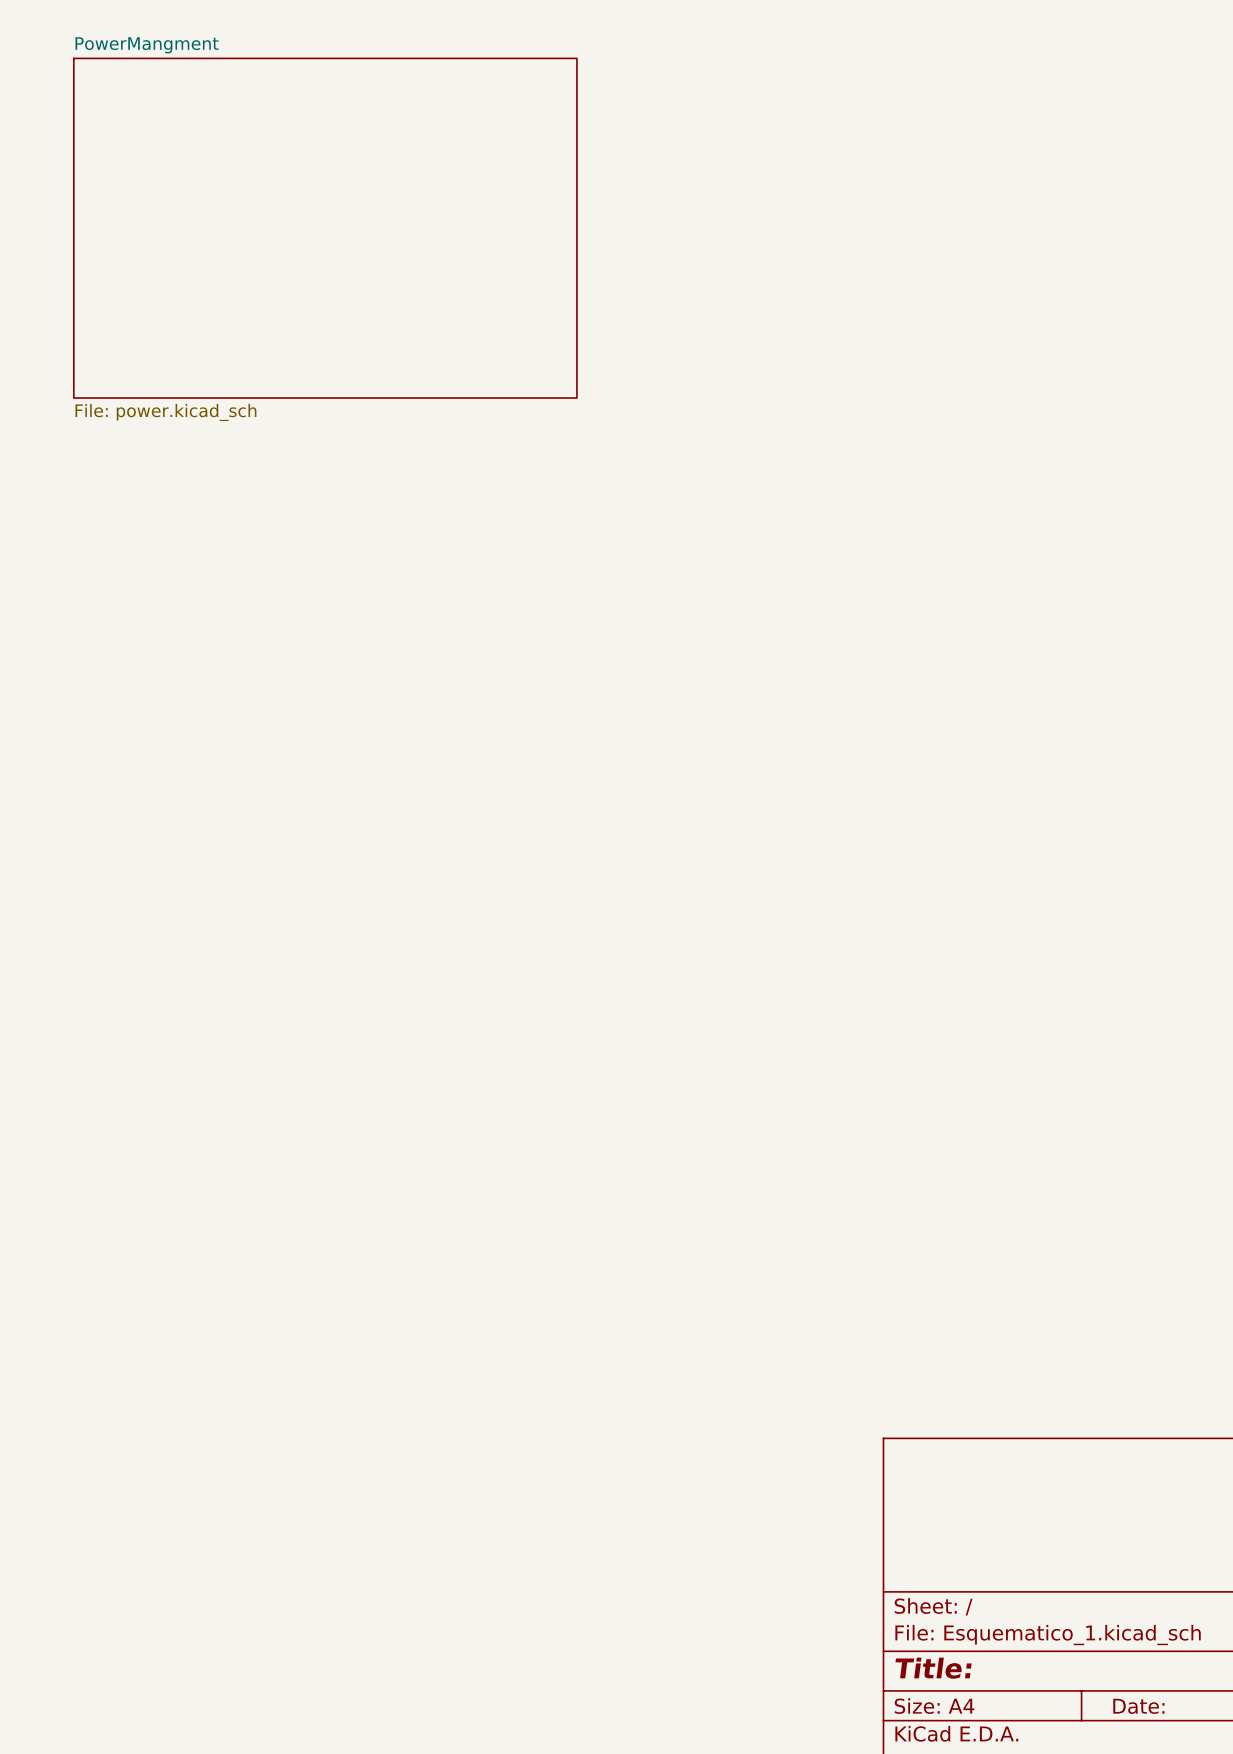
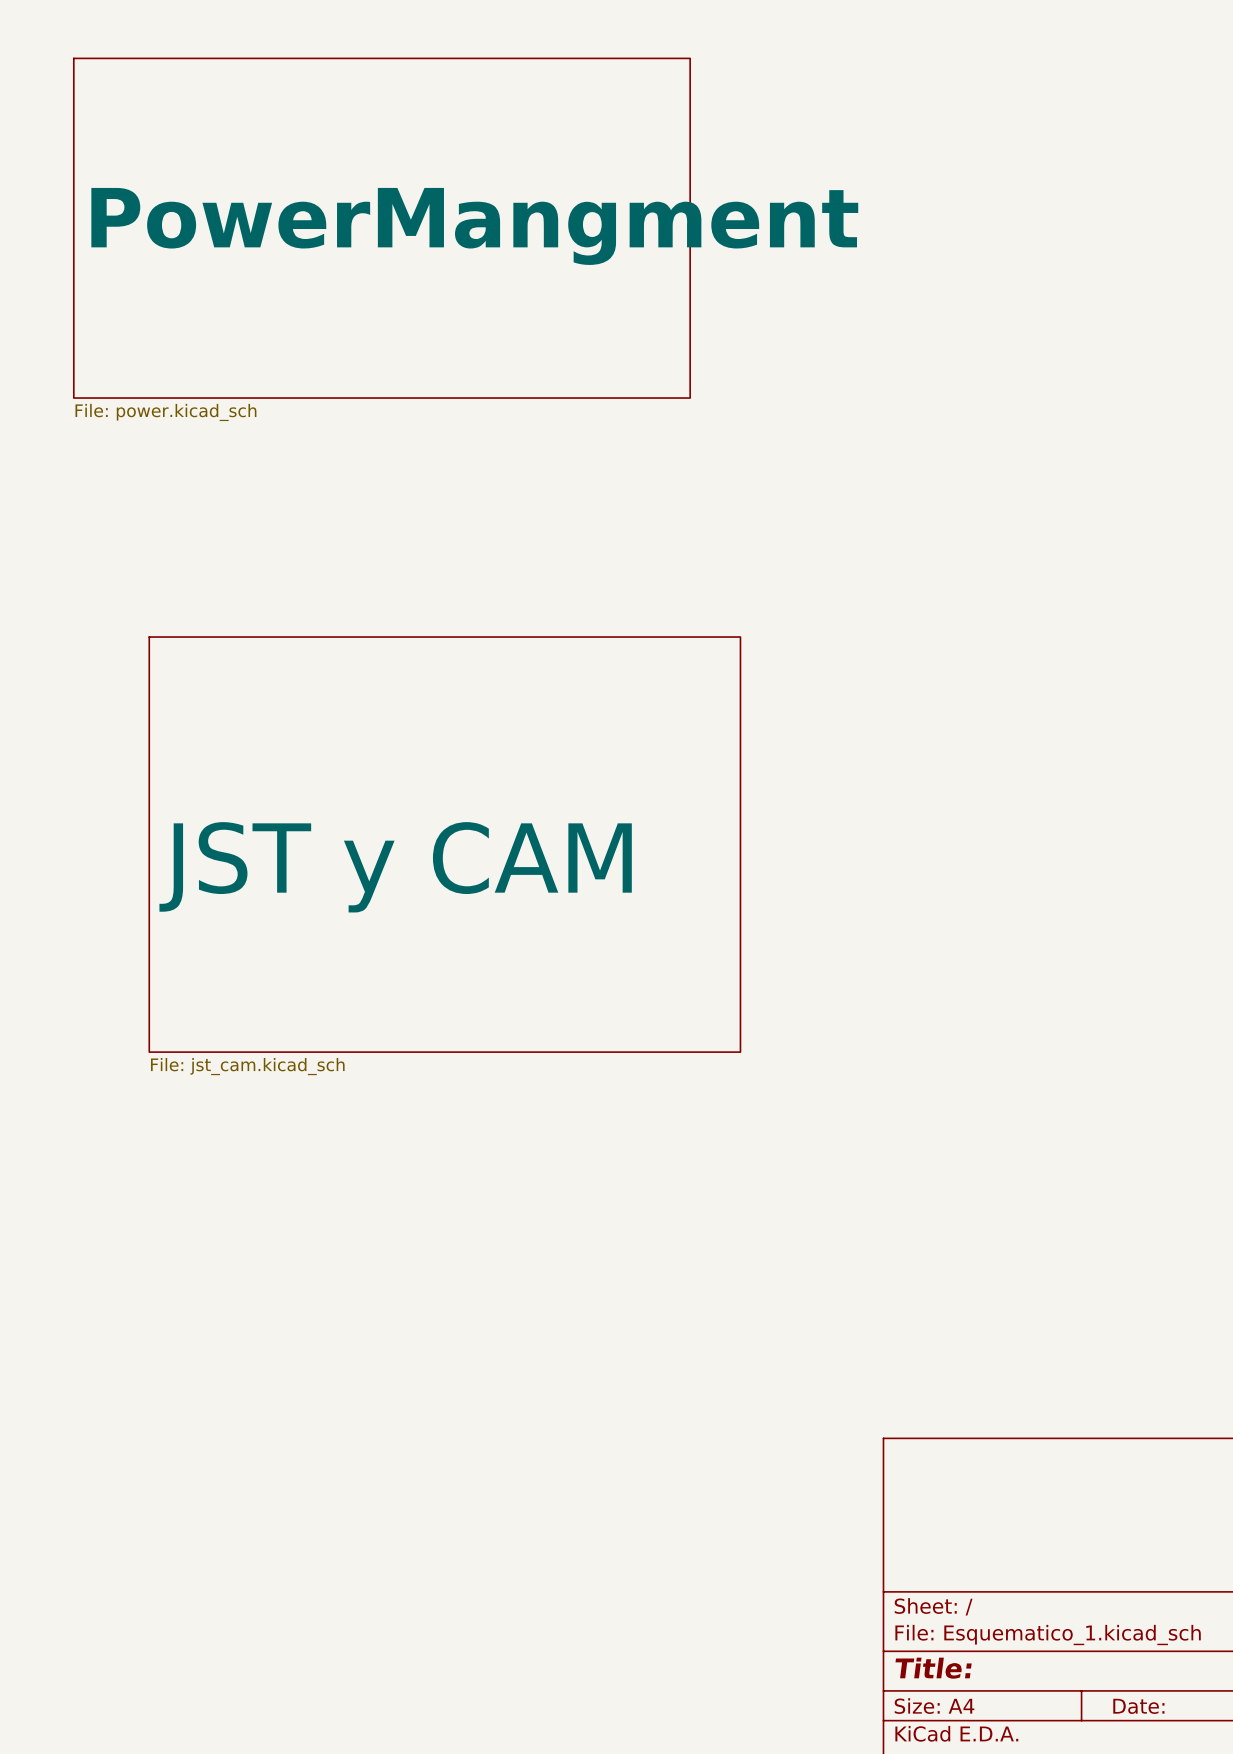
sheet PowerMangment: File: power.kicad_sch (325, 228) -> none
sheet PowerMangment: none -> File: power.kicad_sch (381, 228)
sheet JST y CAM: none -> File: jst_cam.kicad_sch (444, 844)

